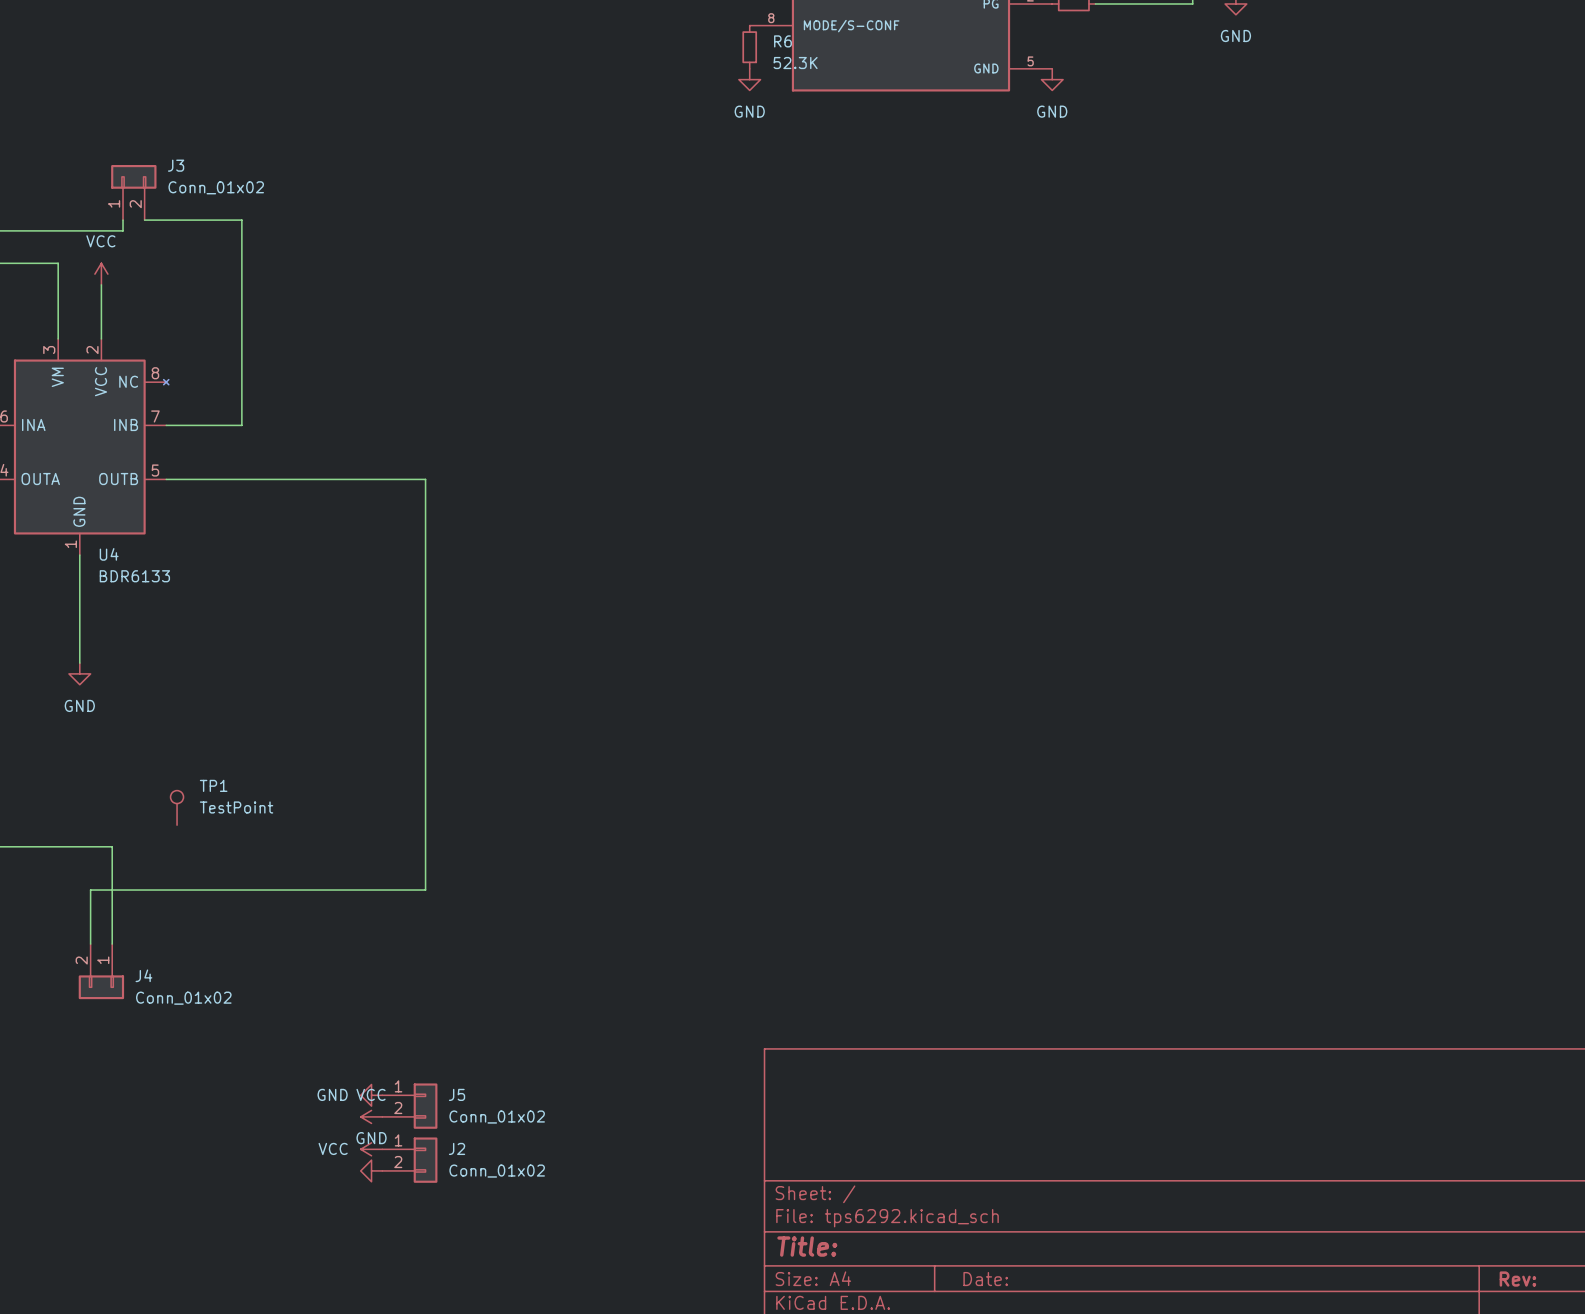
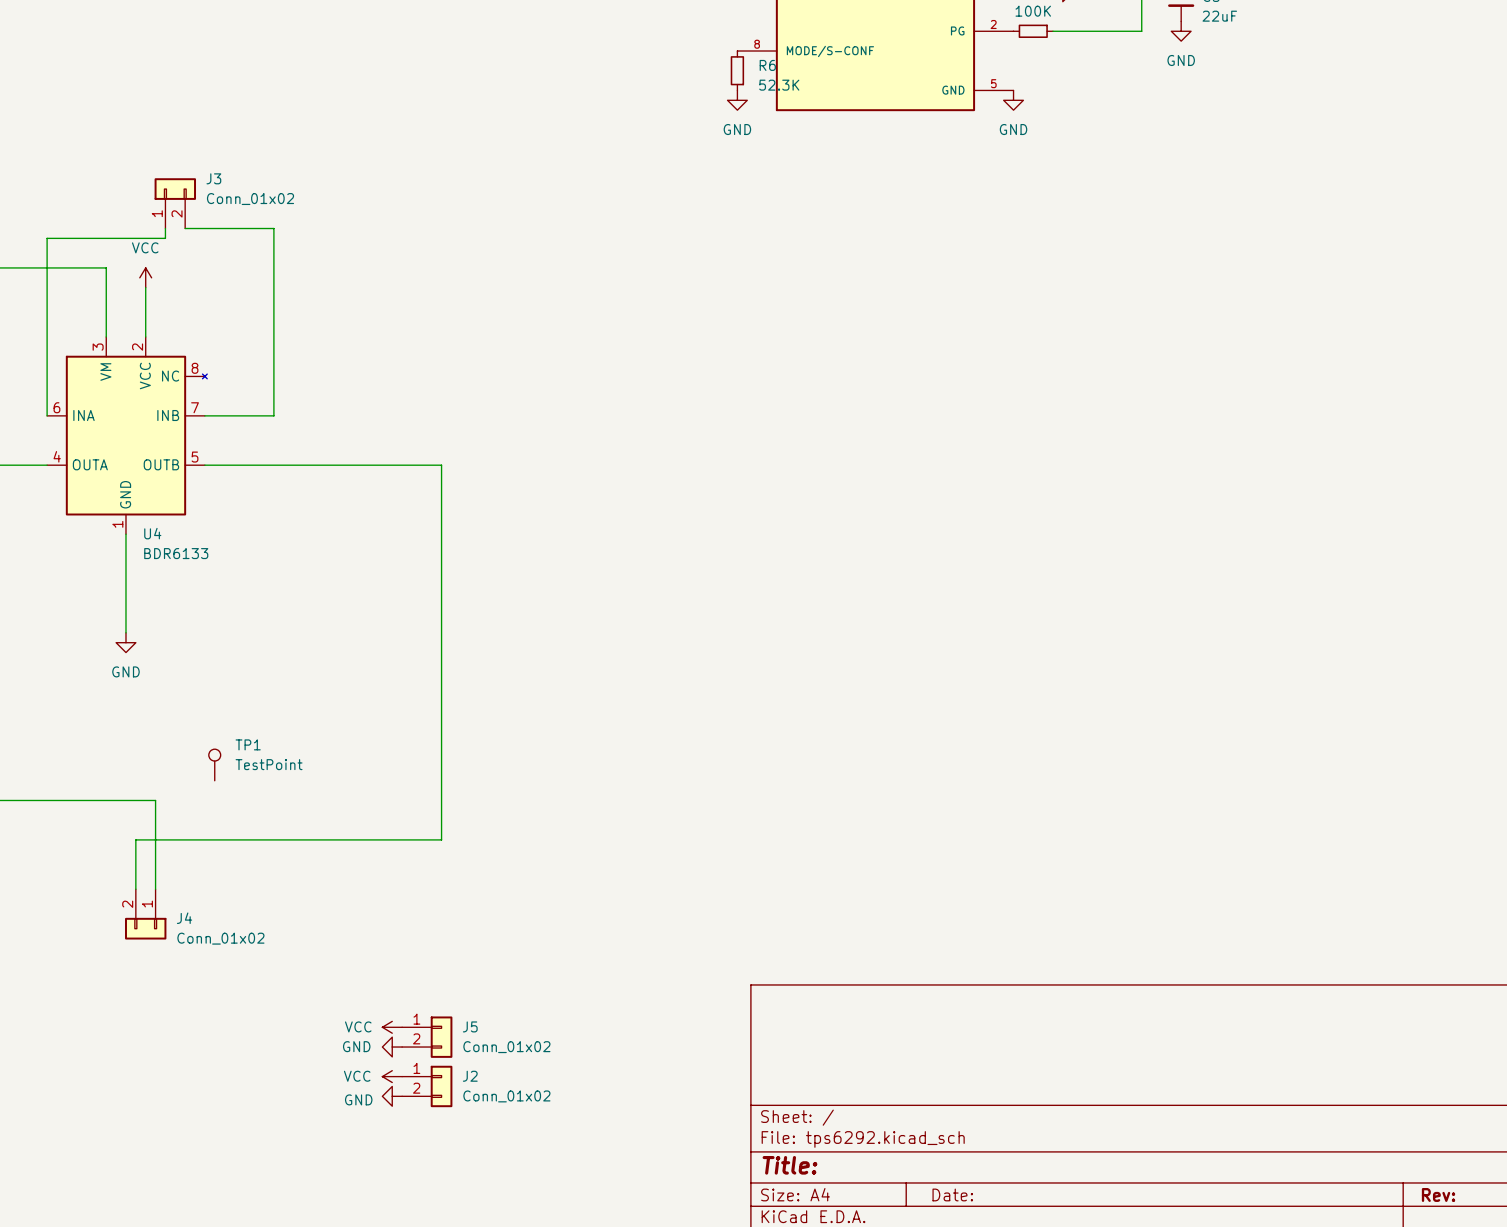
power symbol: GND (371, 1095) -> VCC (392, 1027)
power symbol: VCC (371, 1116) -> GND (392, 1047)
power symbol text position: GND (371, 1138) -> GND (358, 1099)

